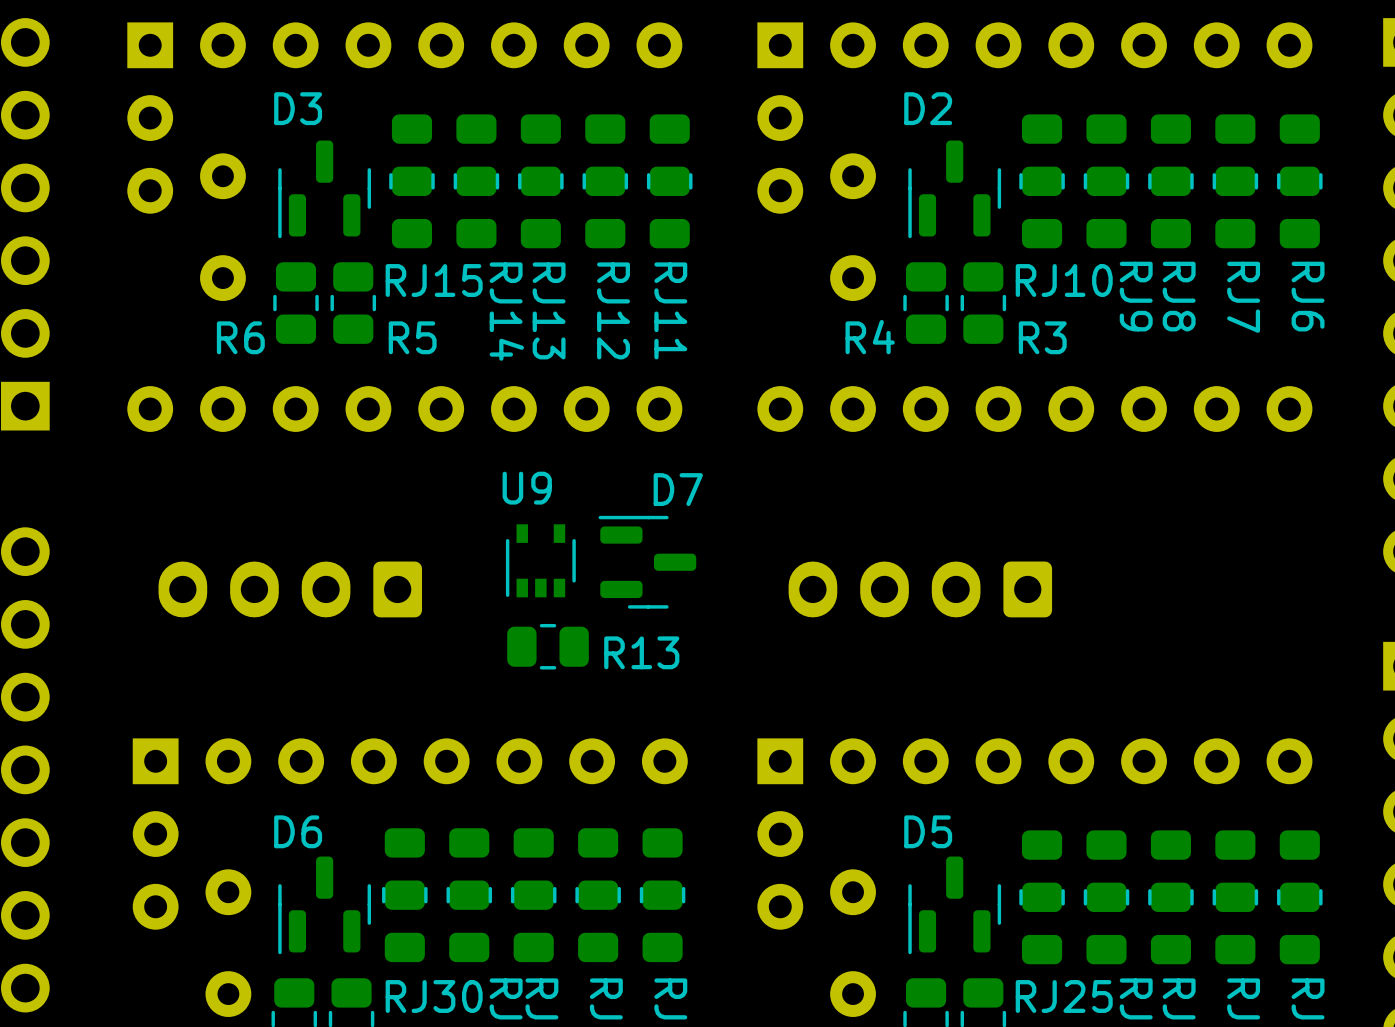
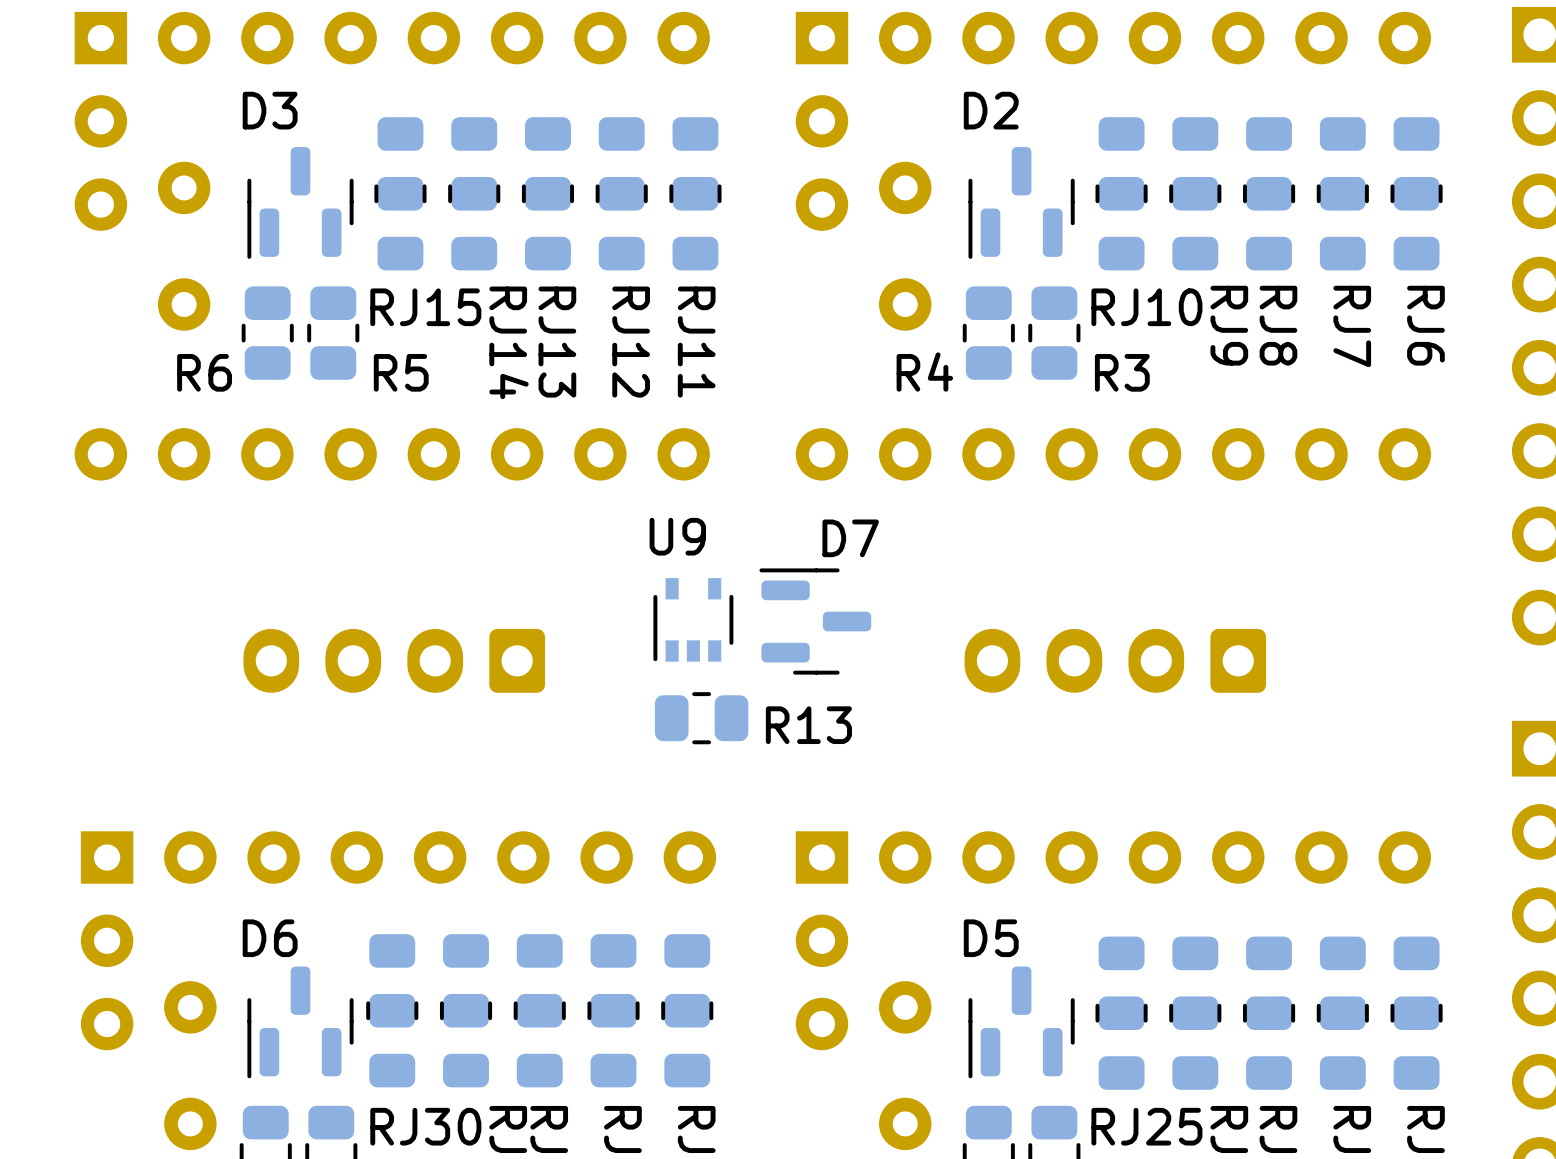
U9 position: (540, 560) -> (693, 619)
D7 position: (647, 562) -> (815, 621)
part position: (290, 589) -> (394, 660)
part position: (920, 589) -> (1115, 660)
R13 position: (548, 646) -> (701, 718)

